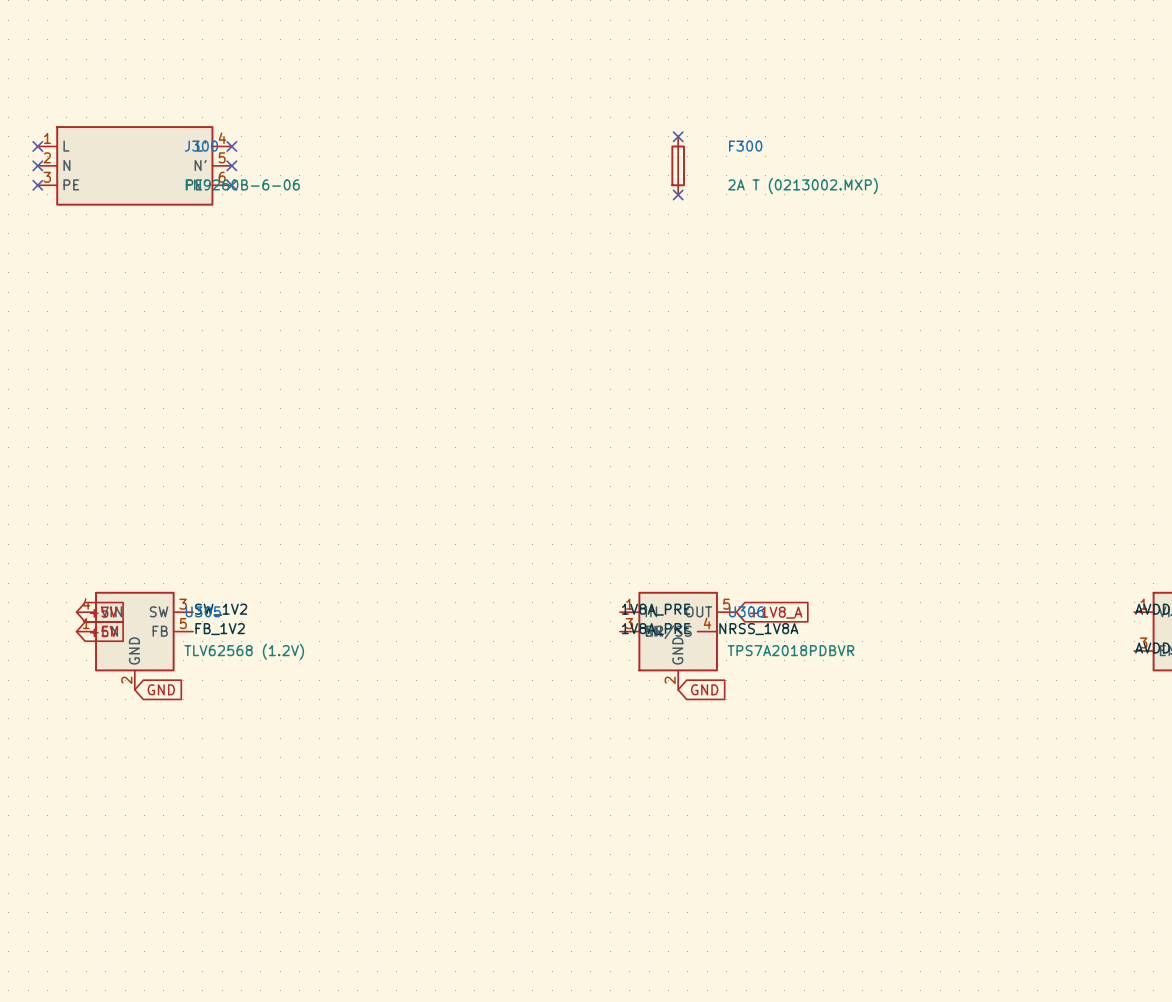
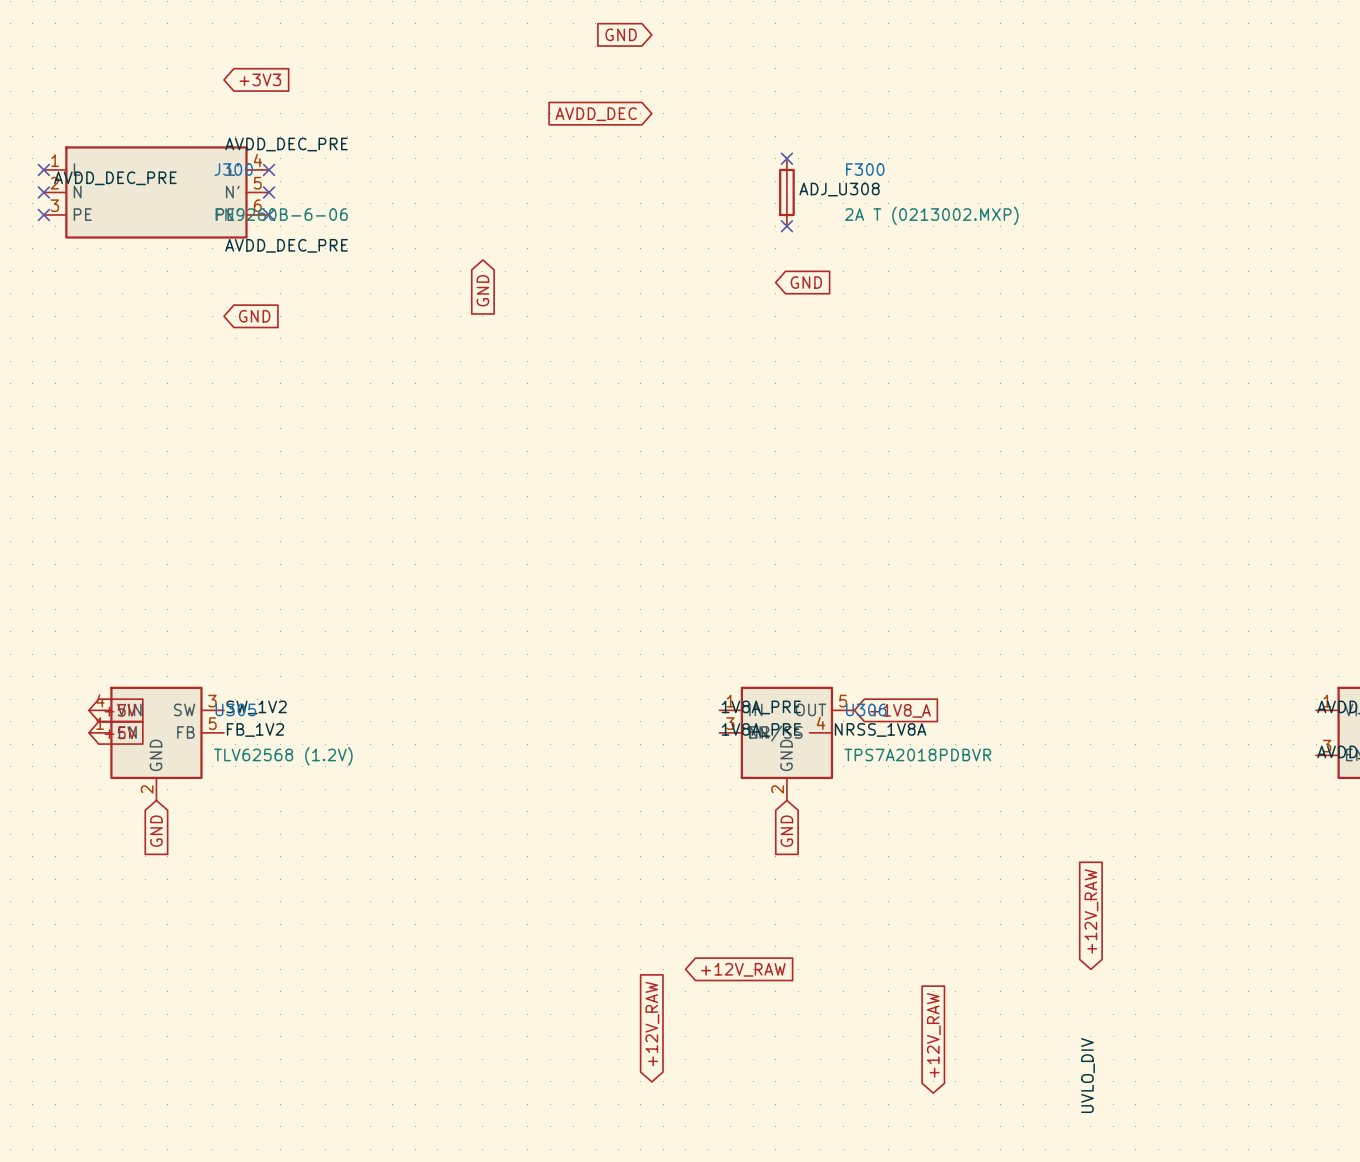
global label: none -> GND (621, 34)
global label: none -> +3V3 (260, 79)
global label: none -> AVDD_DEC (596, 114)
label: none -> AVDD_DEC_PRE (286, 144)
label: none -> AVDD_DEC_PRE (115, 178)
label: none -> ADJ_U308 (839, 189)
label: none -> AVDD_DEC_PRE (286, 245)
global label: none -> GND (806, 282)
global label: none -> GND (482, 290)
global label: none -> GND (254, 316)
global label rotation: 0° (161, 689) -> 90° clockwise (156, 831)
global label rotation: 0° (704, 689) -> 90° clockwise (786, 831)
global label: none -> +12V_RAW (1091, 911)
global label: none -> +12V_RAW (743, 969)
global label: none -> +12V_RAW (652, 1024)
global label: none -> +12V_RAW (933, 1035)
label: none -> UVLO_DIV (1087, 1075)

